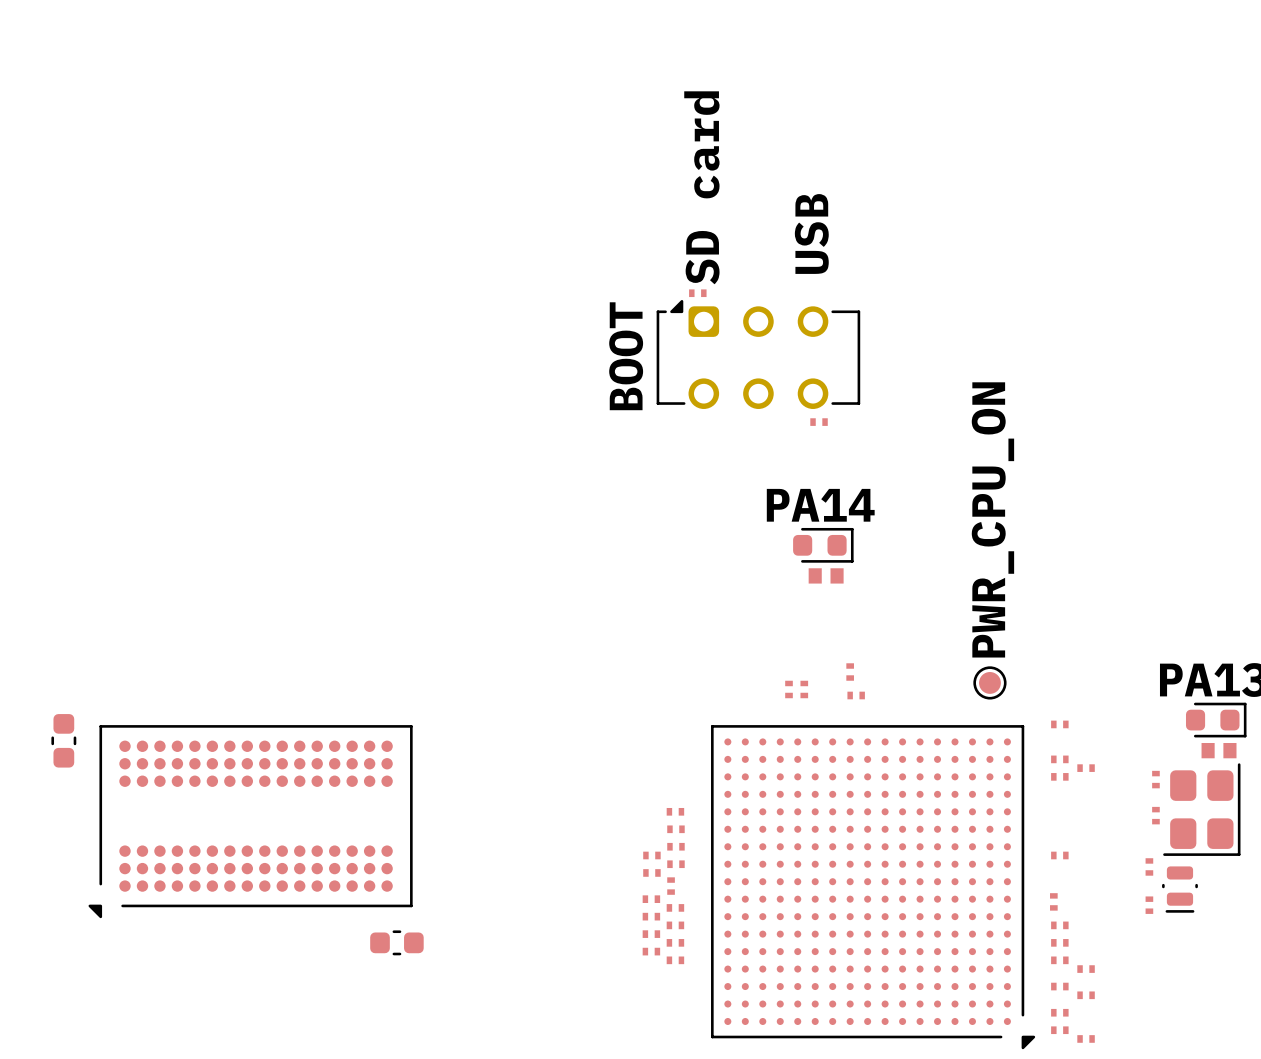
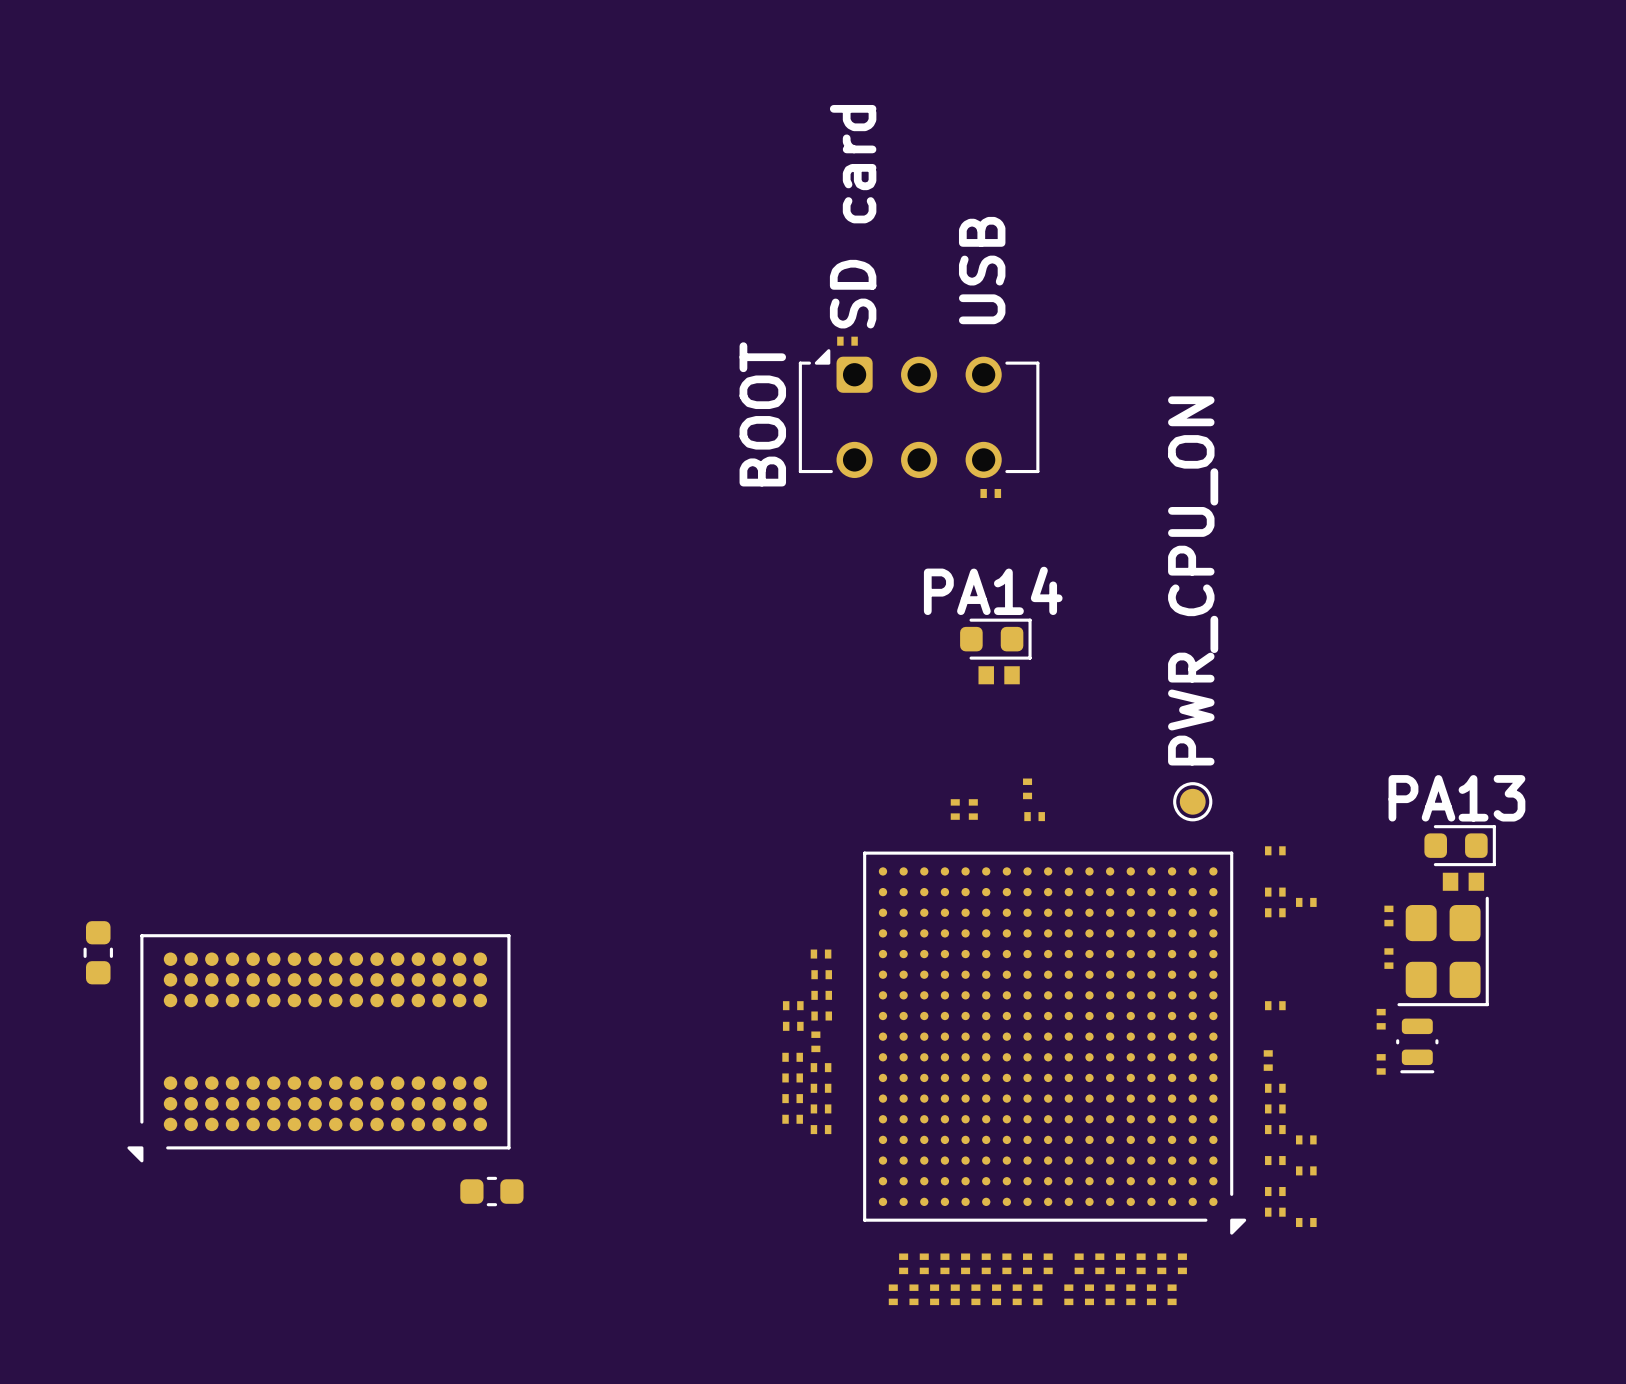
part position: (63, 740) -> (98, 952)
part position: (250, 821) -> (318, 1048)
part position: (396, 942) -> (491, 1191)

